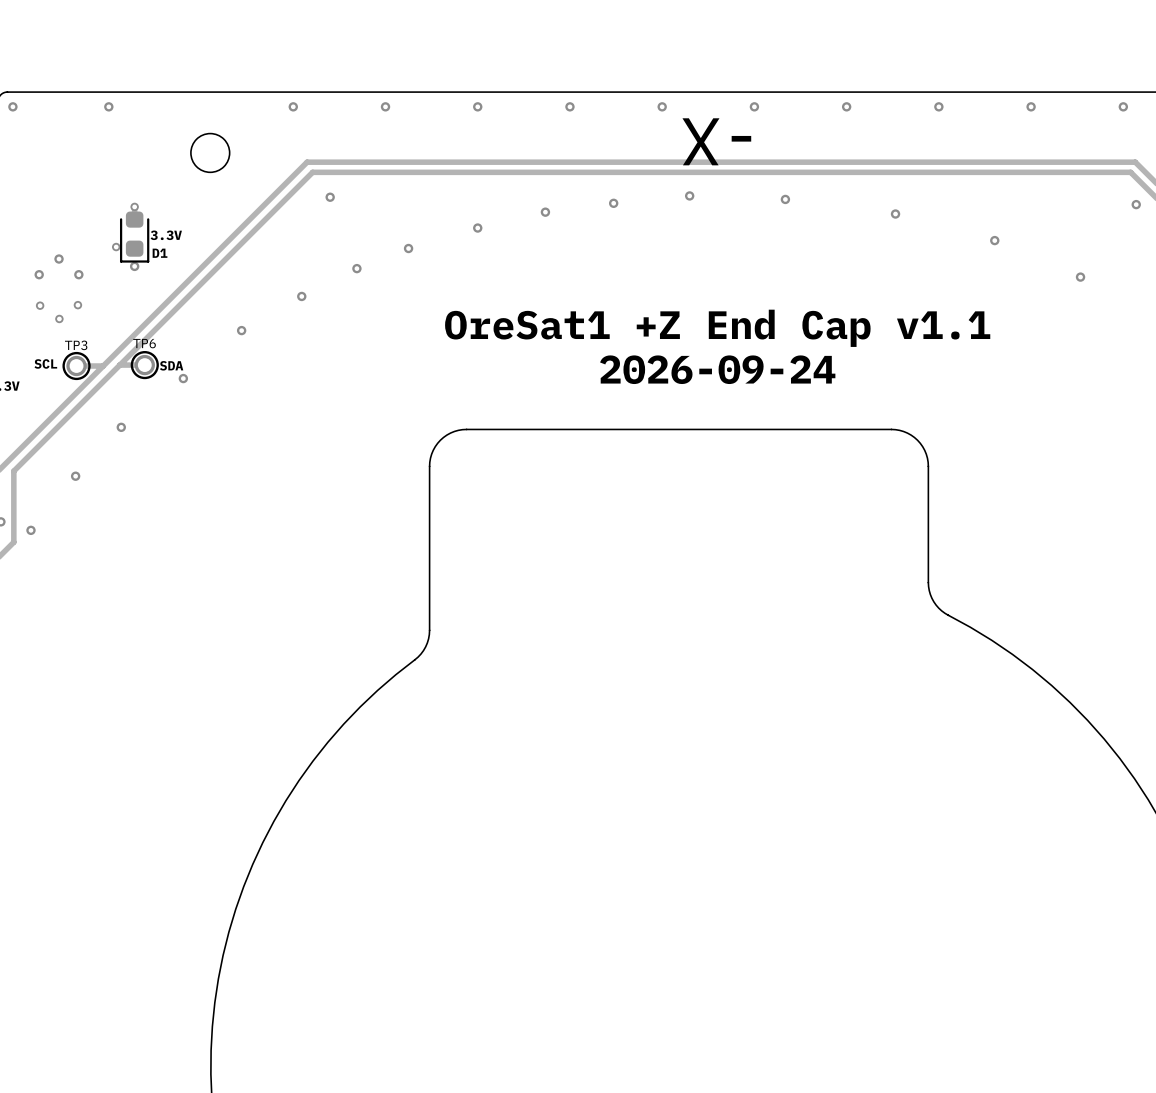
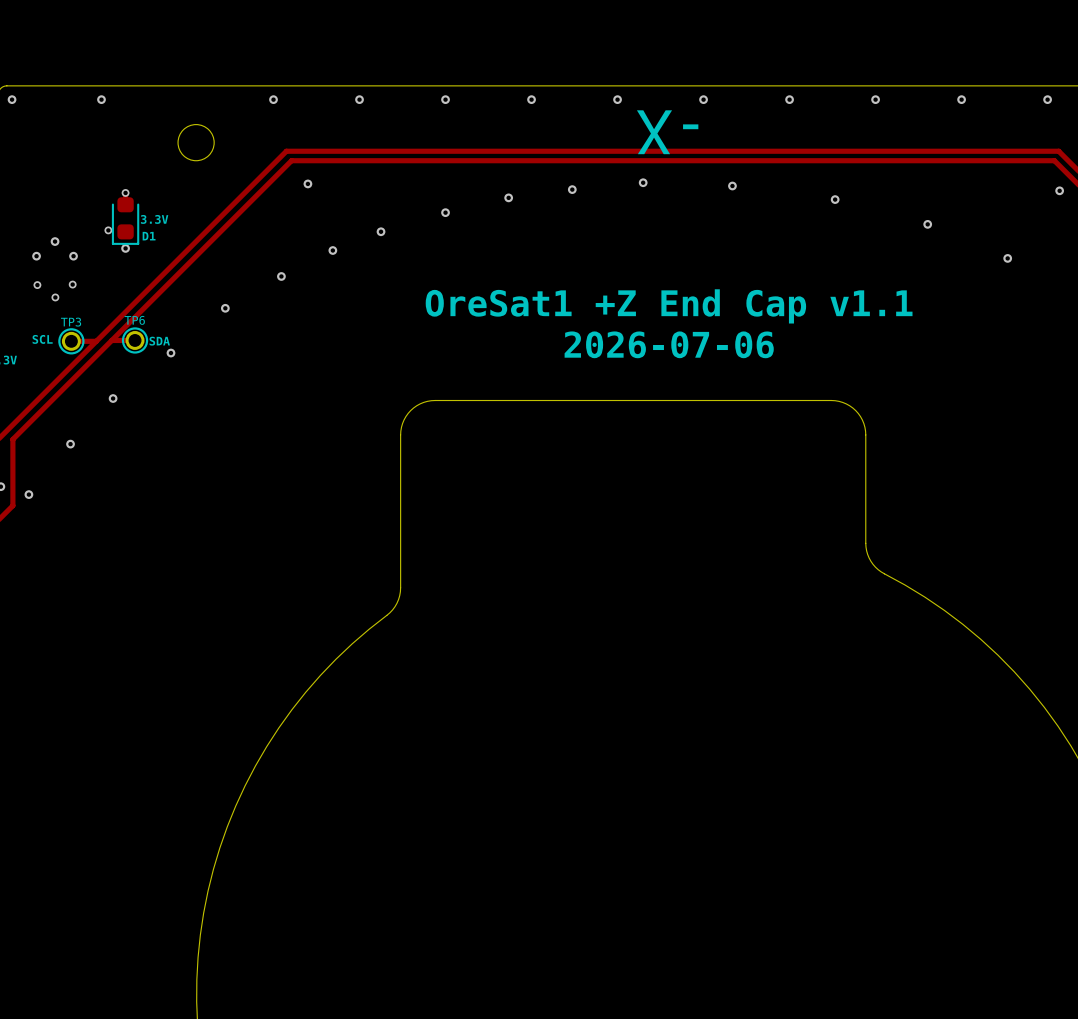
text: 2026-09-24 (717, 369) -> 2026-07-06 (669, 344)

